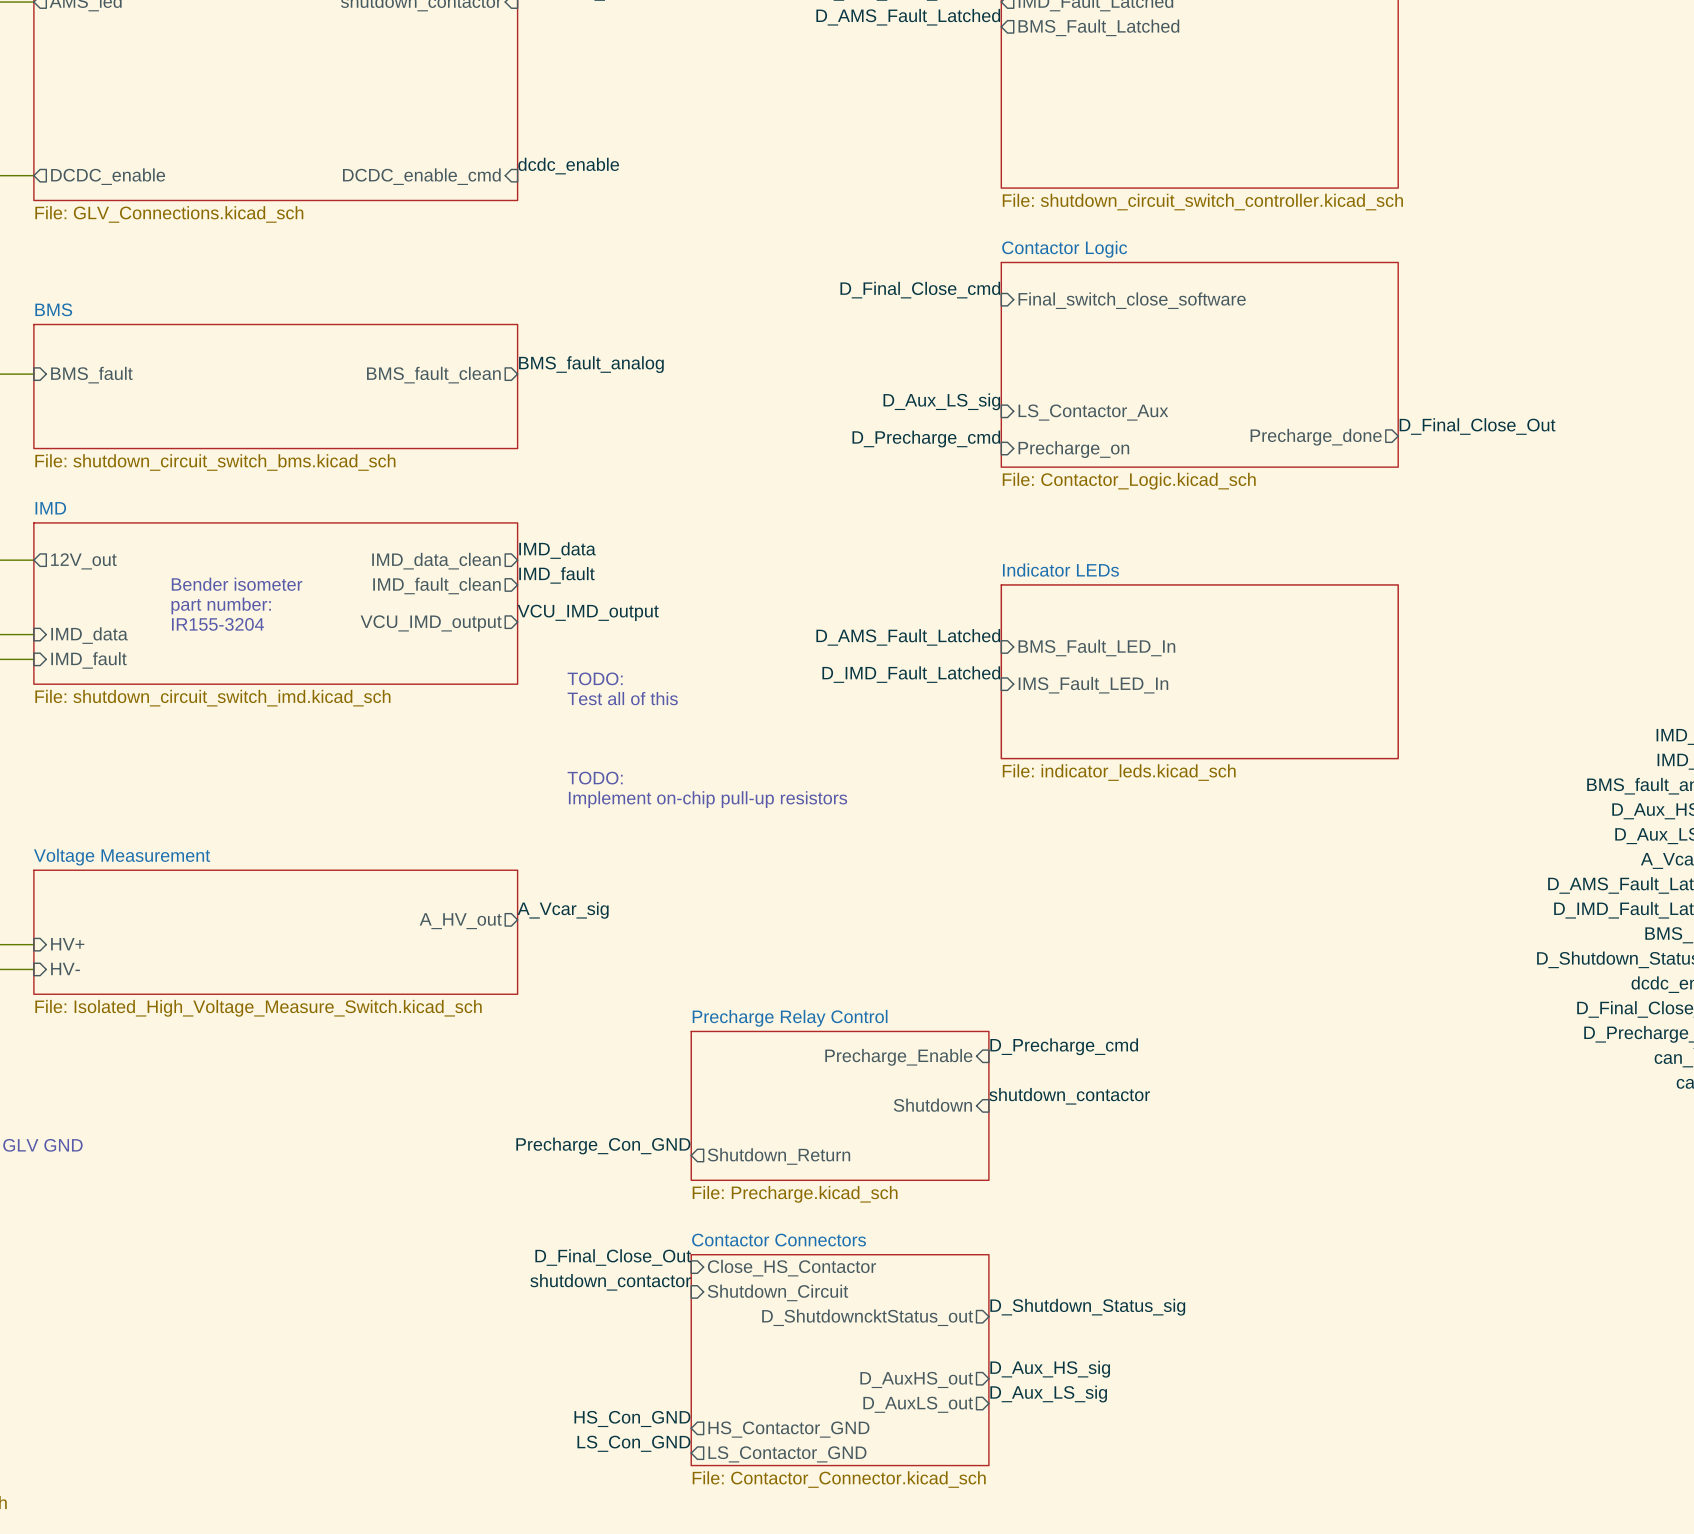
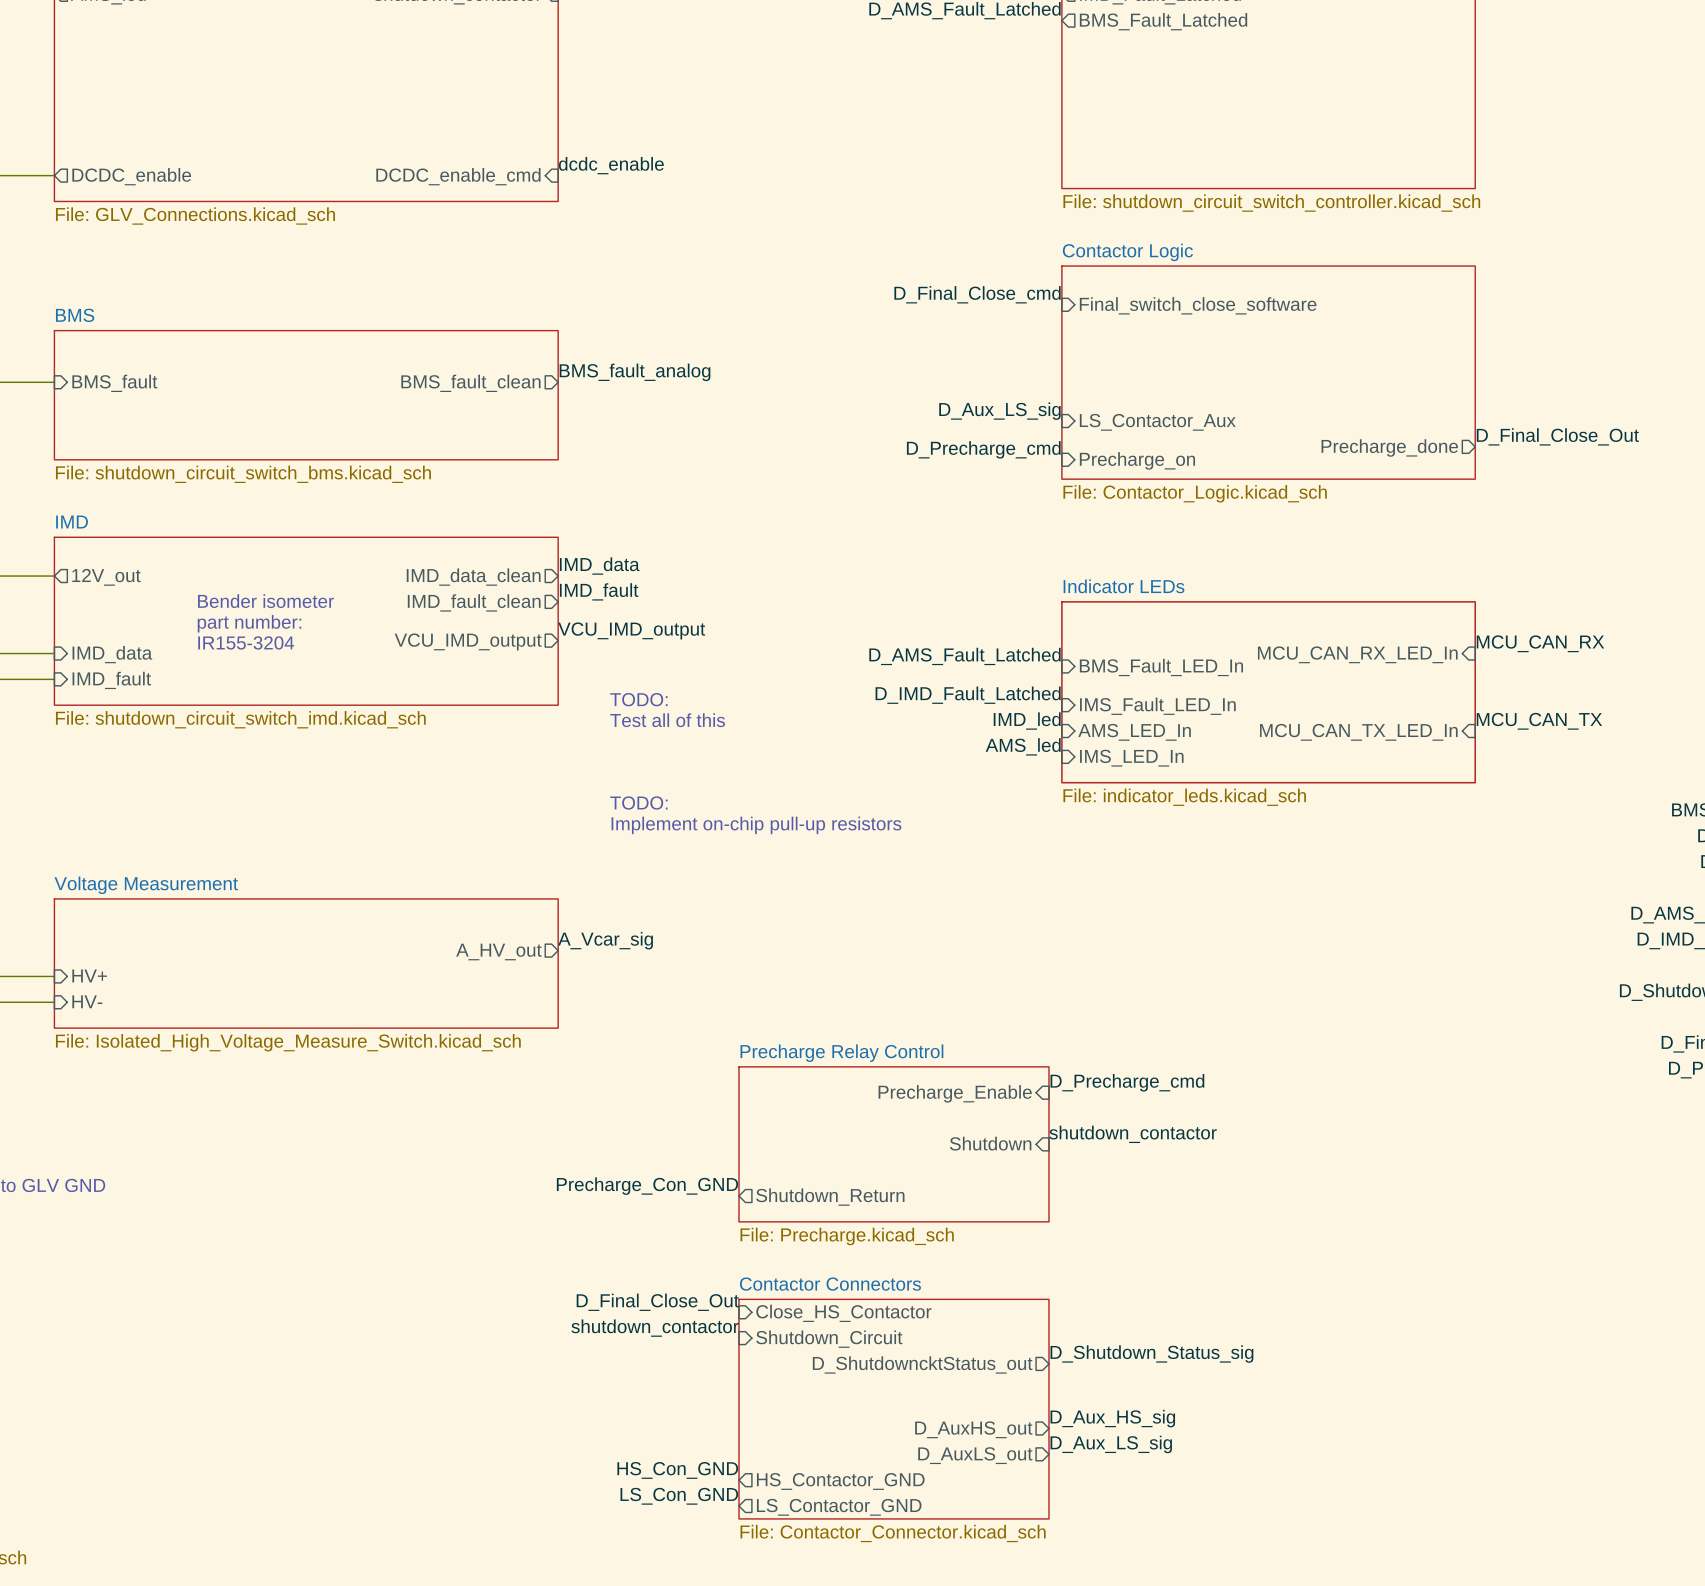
label: none -> MCU_CAN_RX (1540, 643)
sheet pin: none -> MCU_CAN_RX_LED_In (1357, 654)
label: none -> IMD_led (1027, 721)
label: none -> MCU_CAN_TX (1539, 721)
sheet pin: none -> AMS_LED_In (1134, 732)
sheet pin: none -> MCU_CAN_TX_LED_In (1358, 732)
label: none -> AMS_led (1023, 746)
sheet pin: none -> IMS_LED_In (1131, 758)

